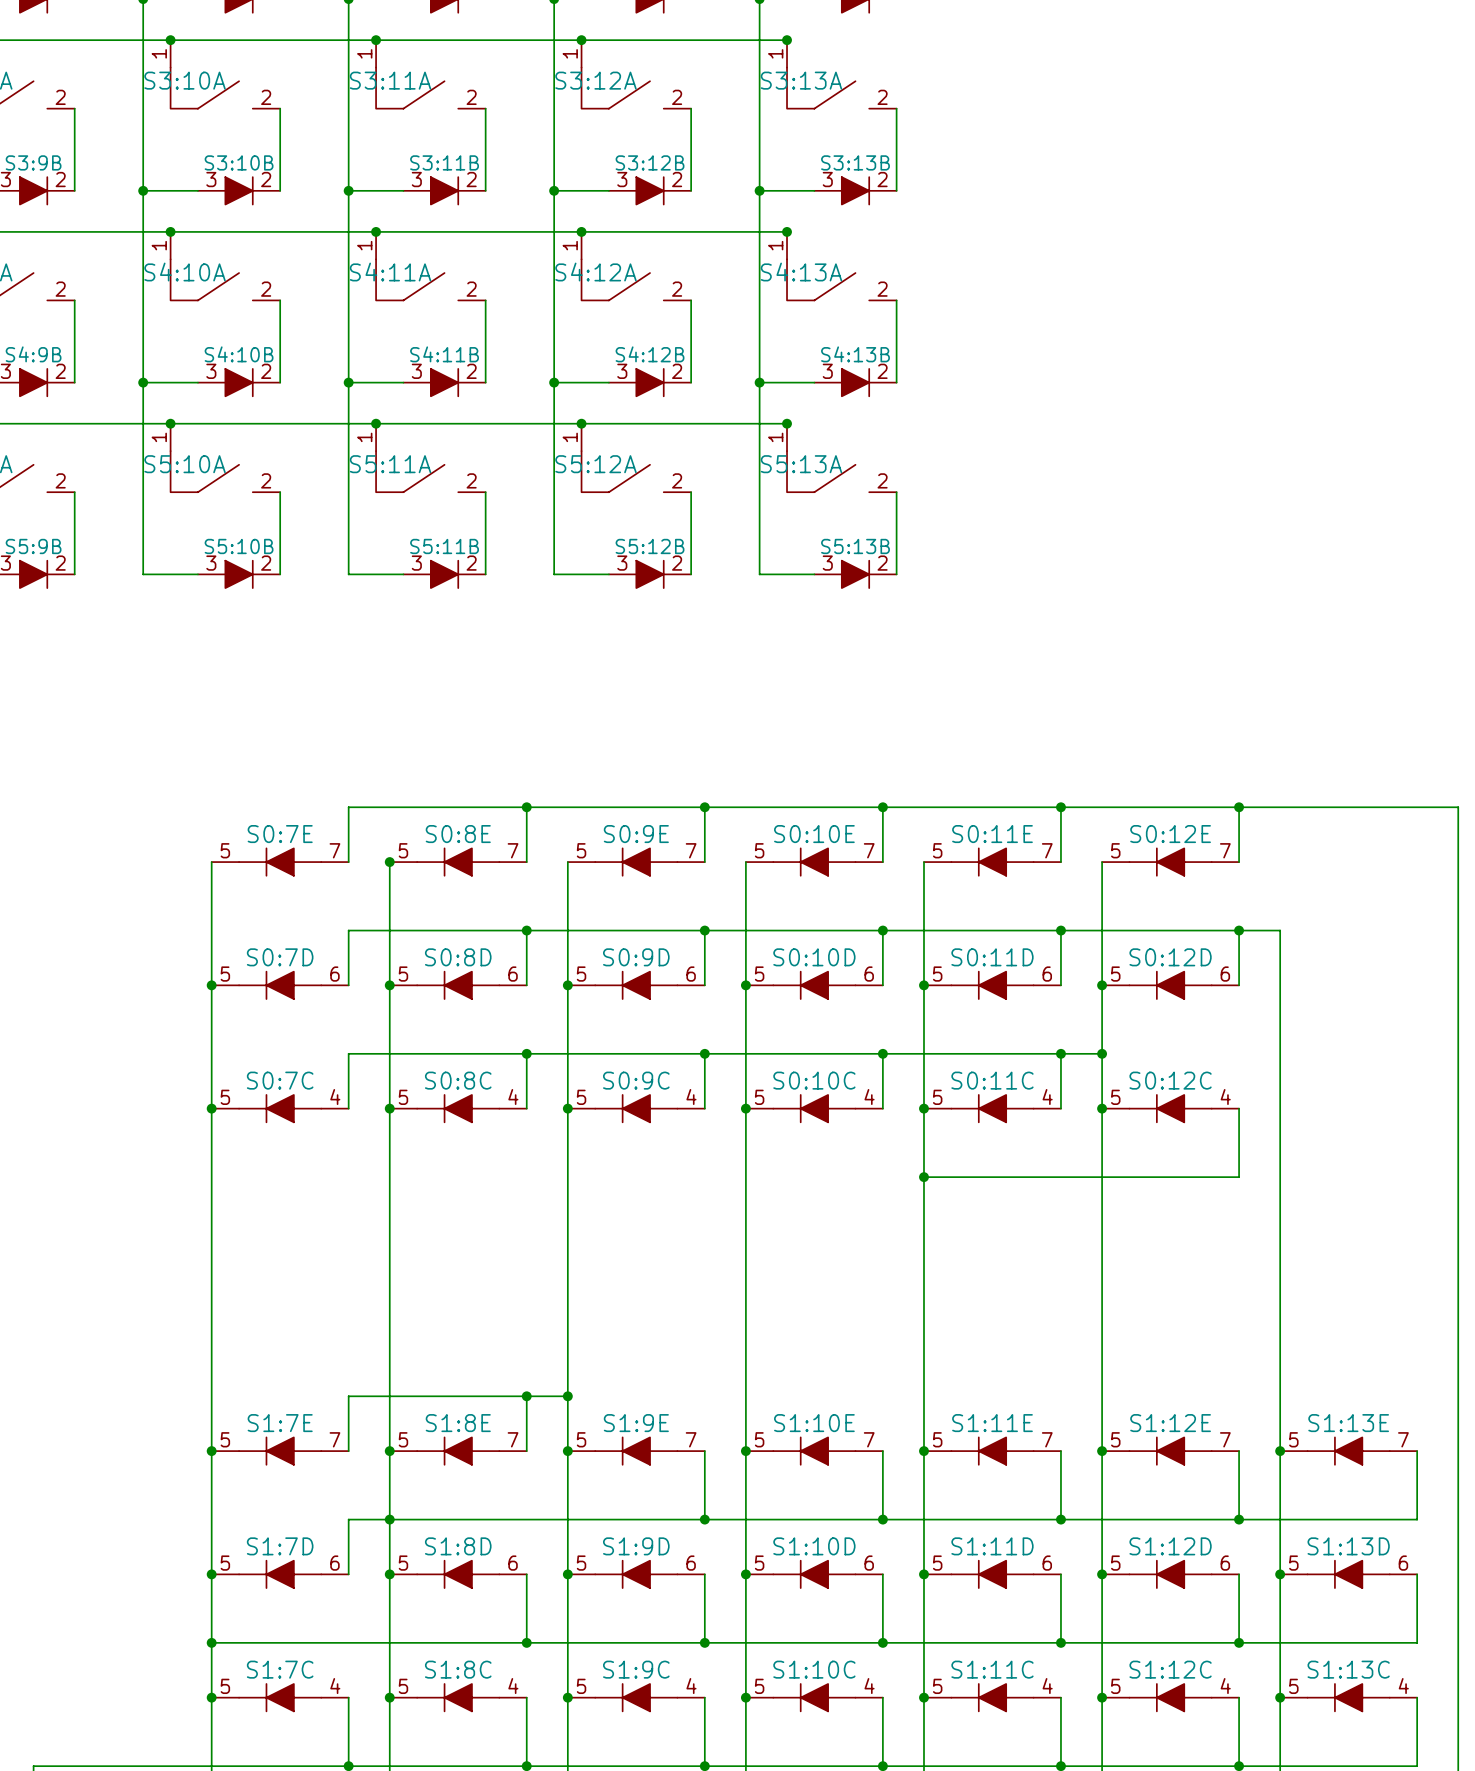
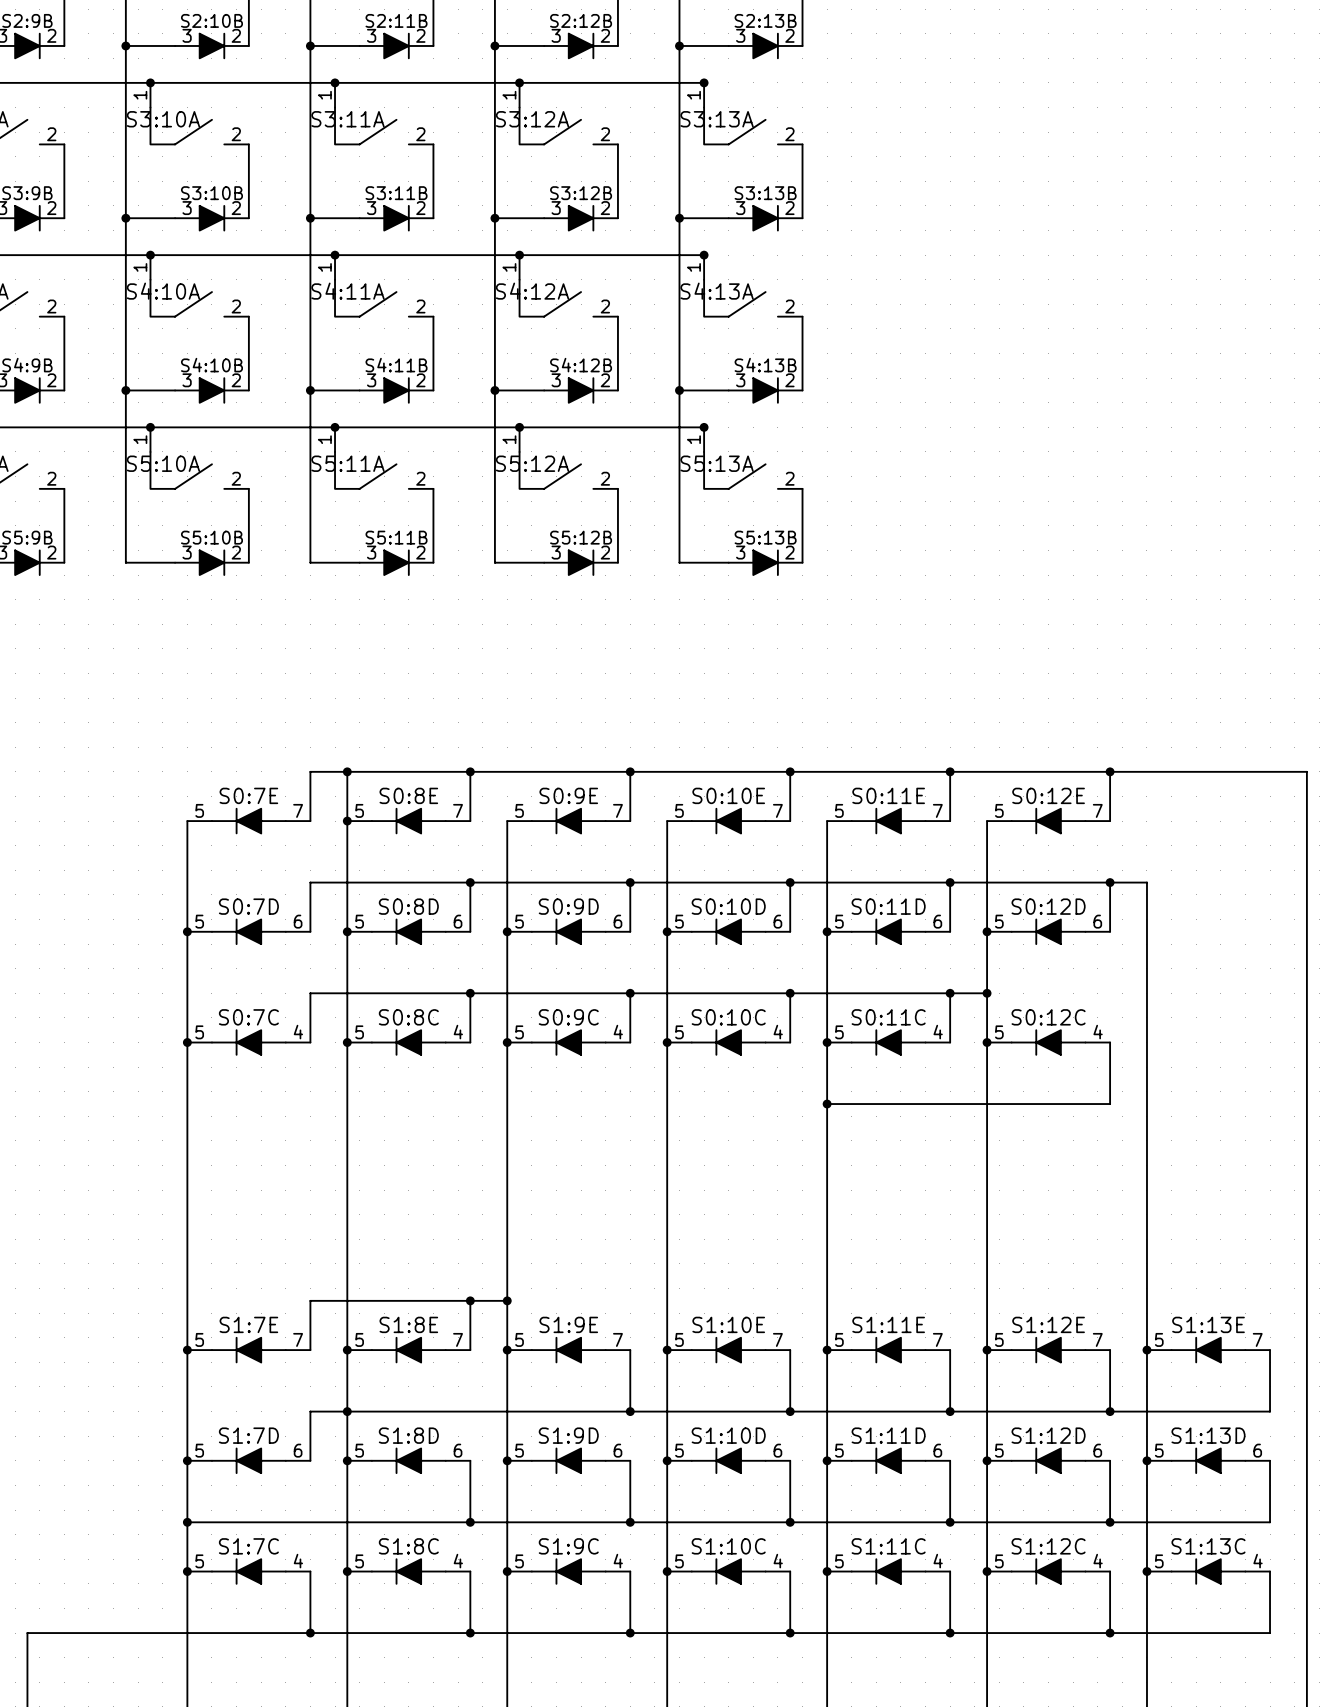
wire: none -> (347, 771) (347, 821)
junction: none -> (347, 771)

